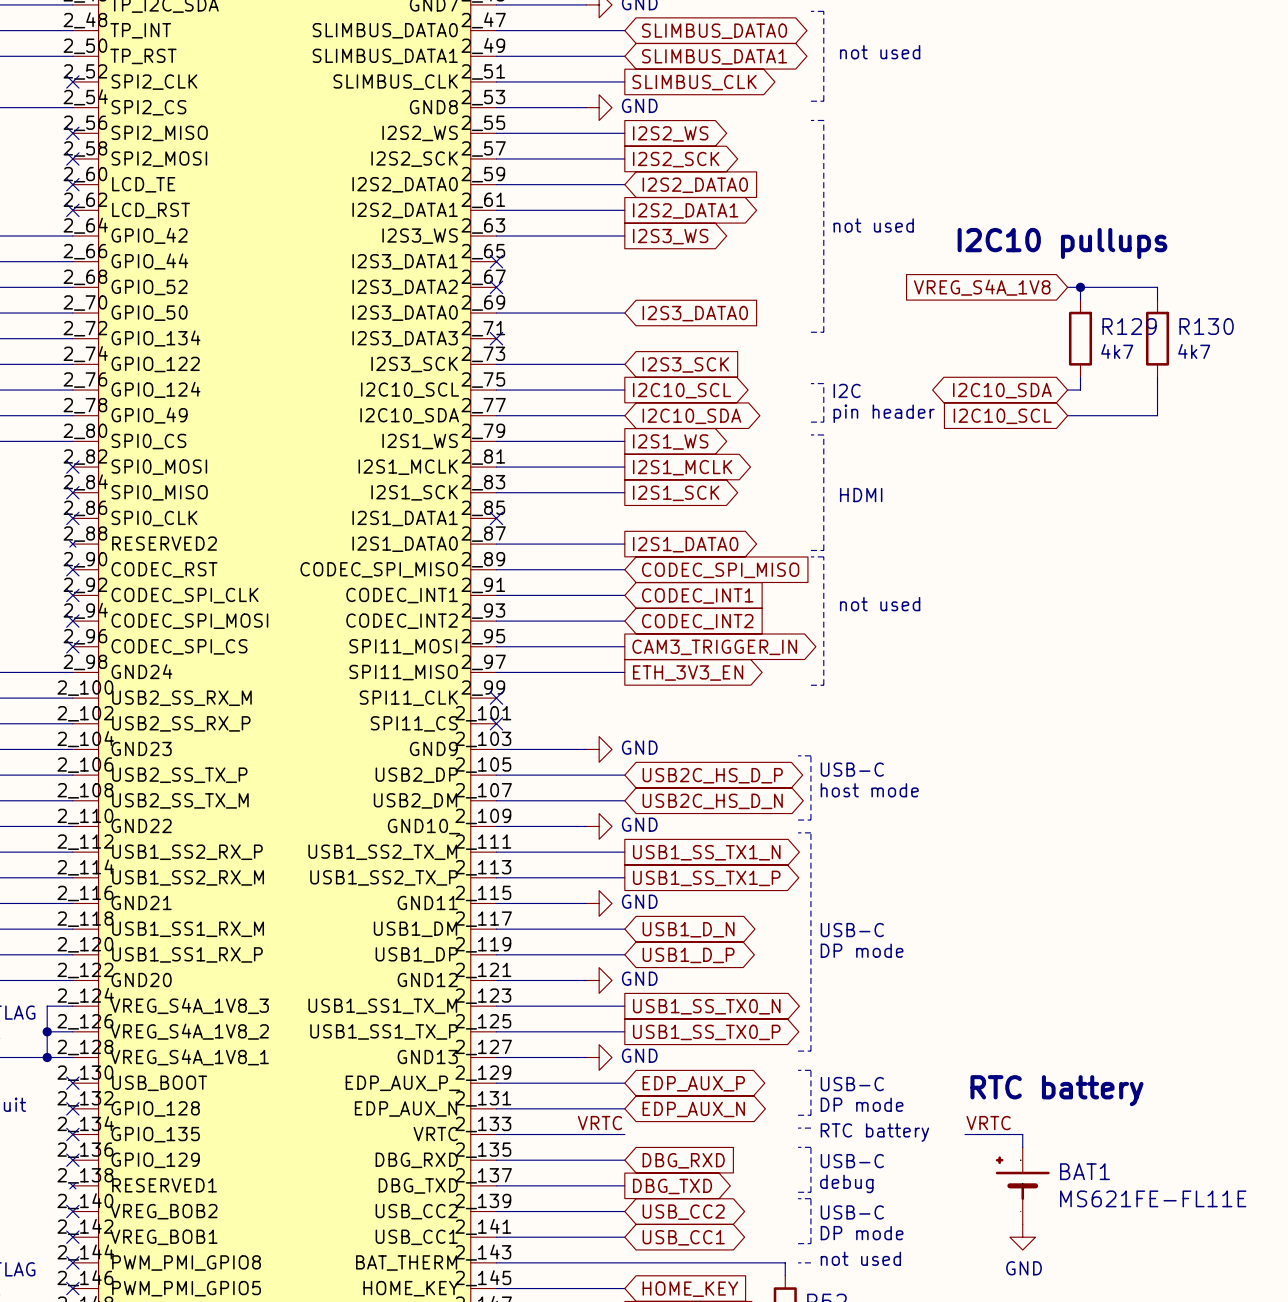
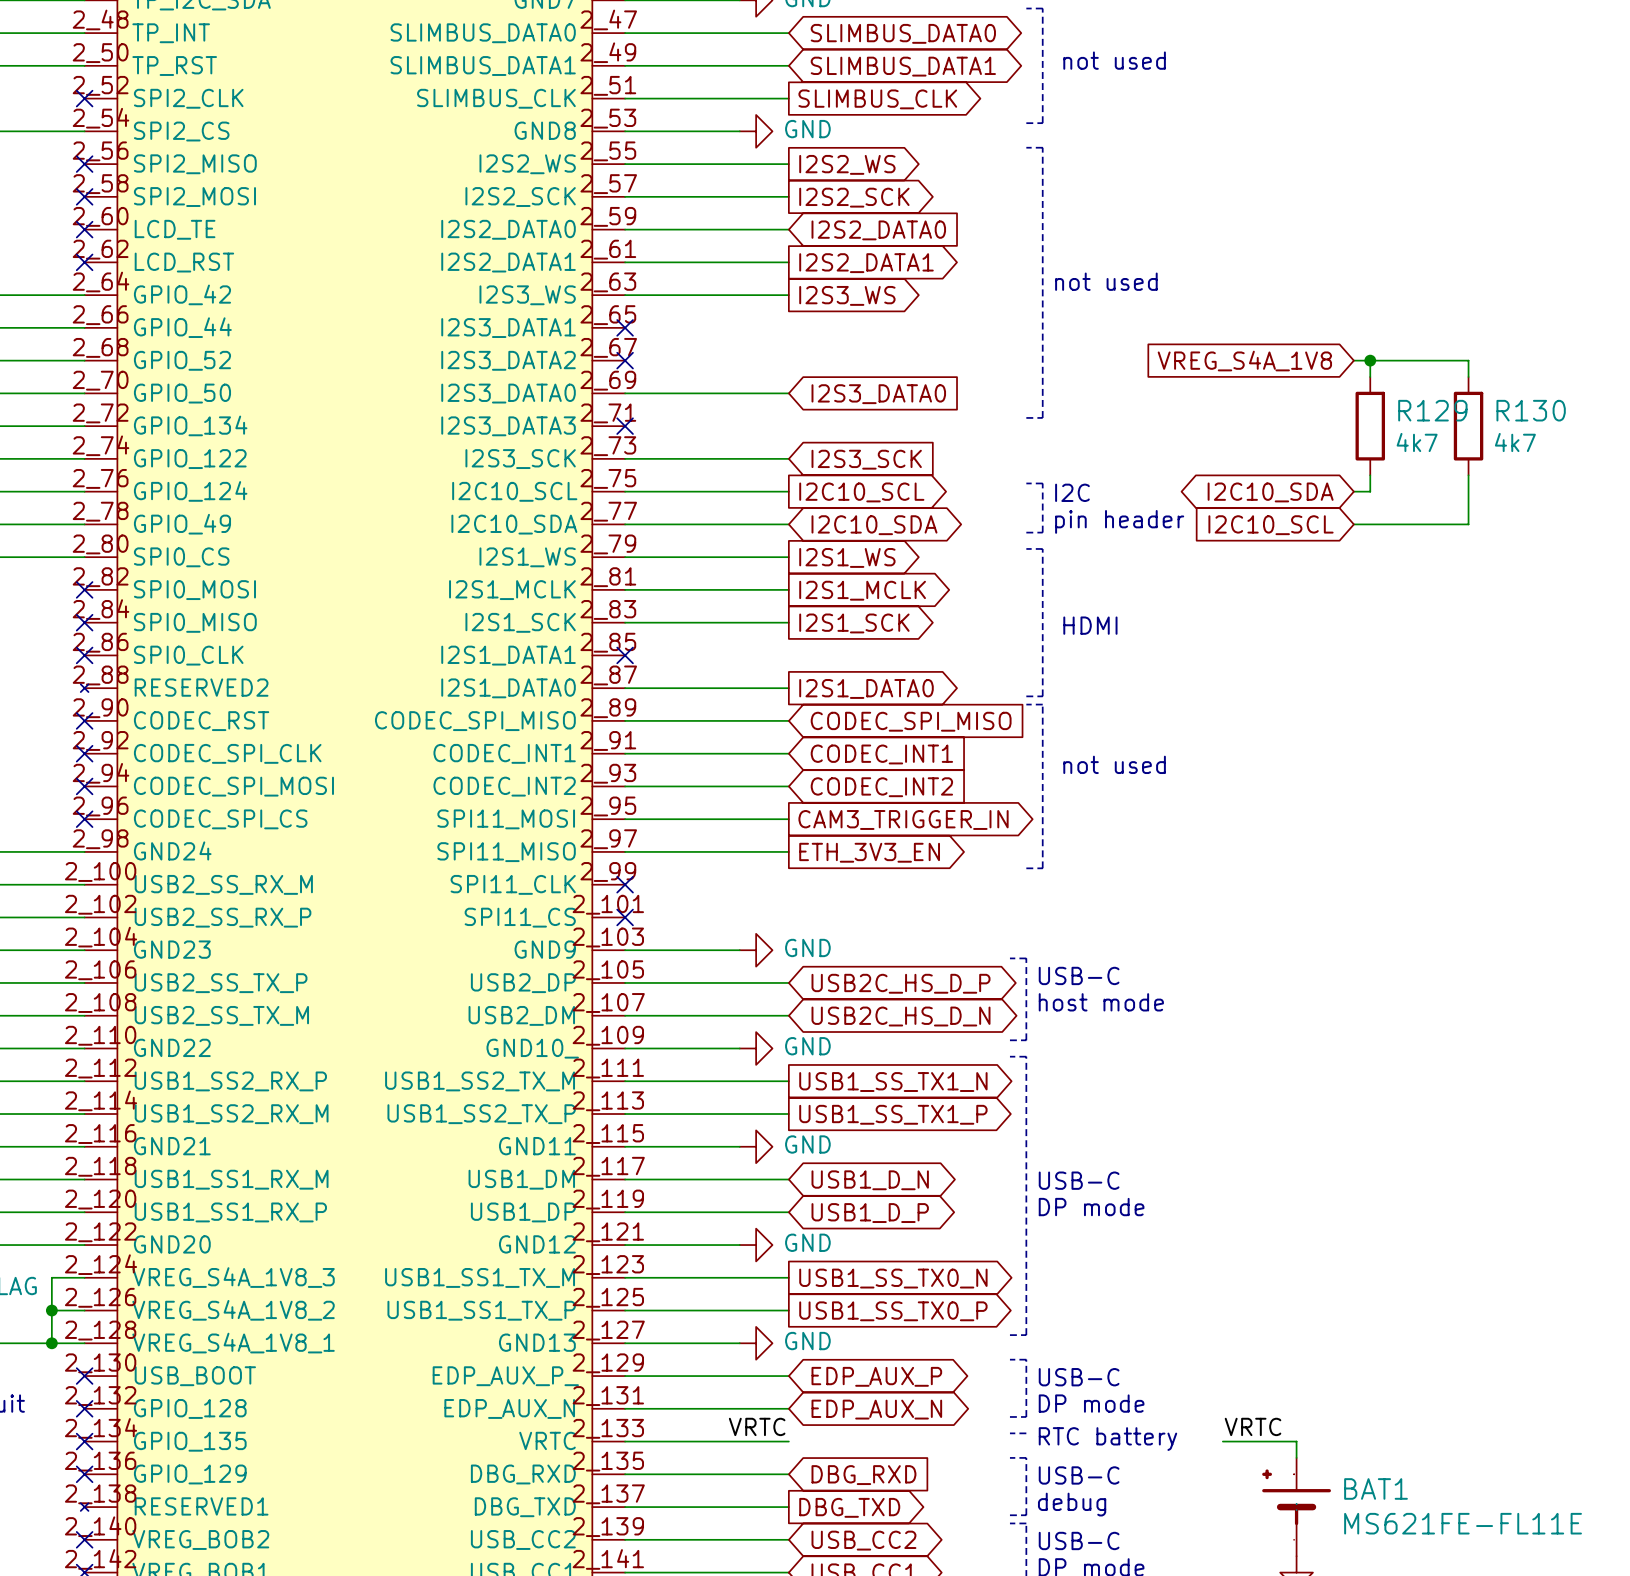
text: I2C10 pullups (1062, 243) -> none
text: RTC battery (1056, 1090) -> none

